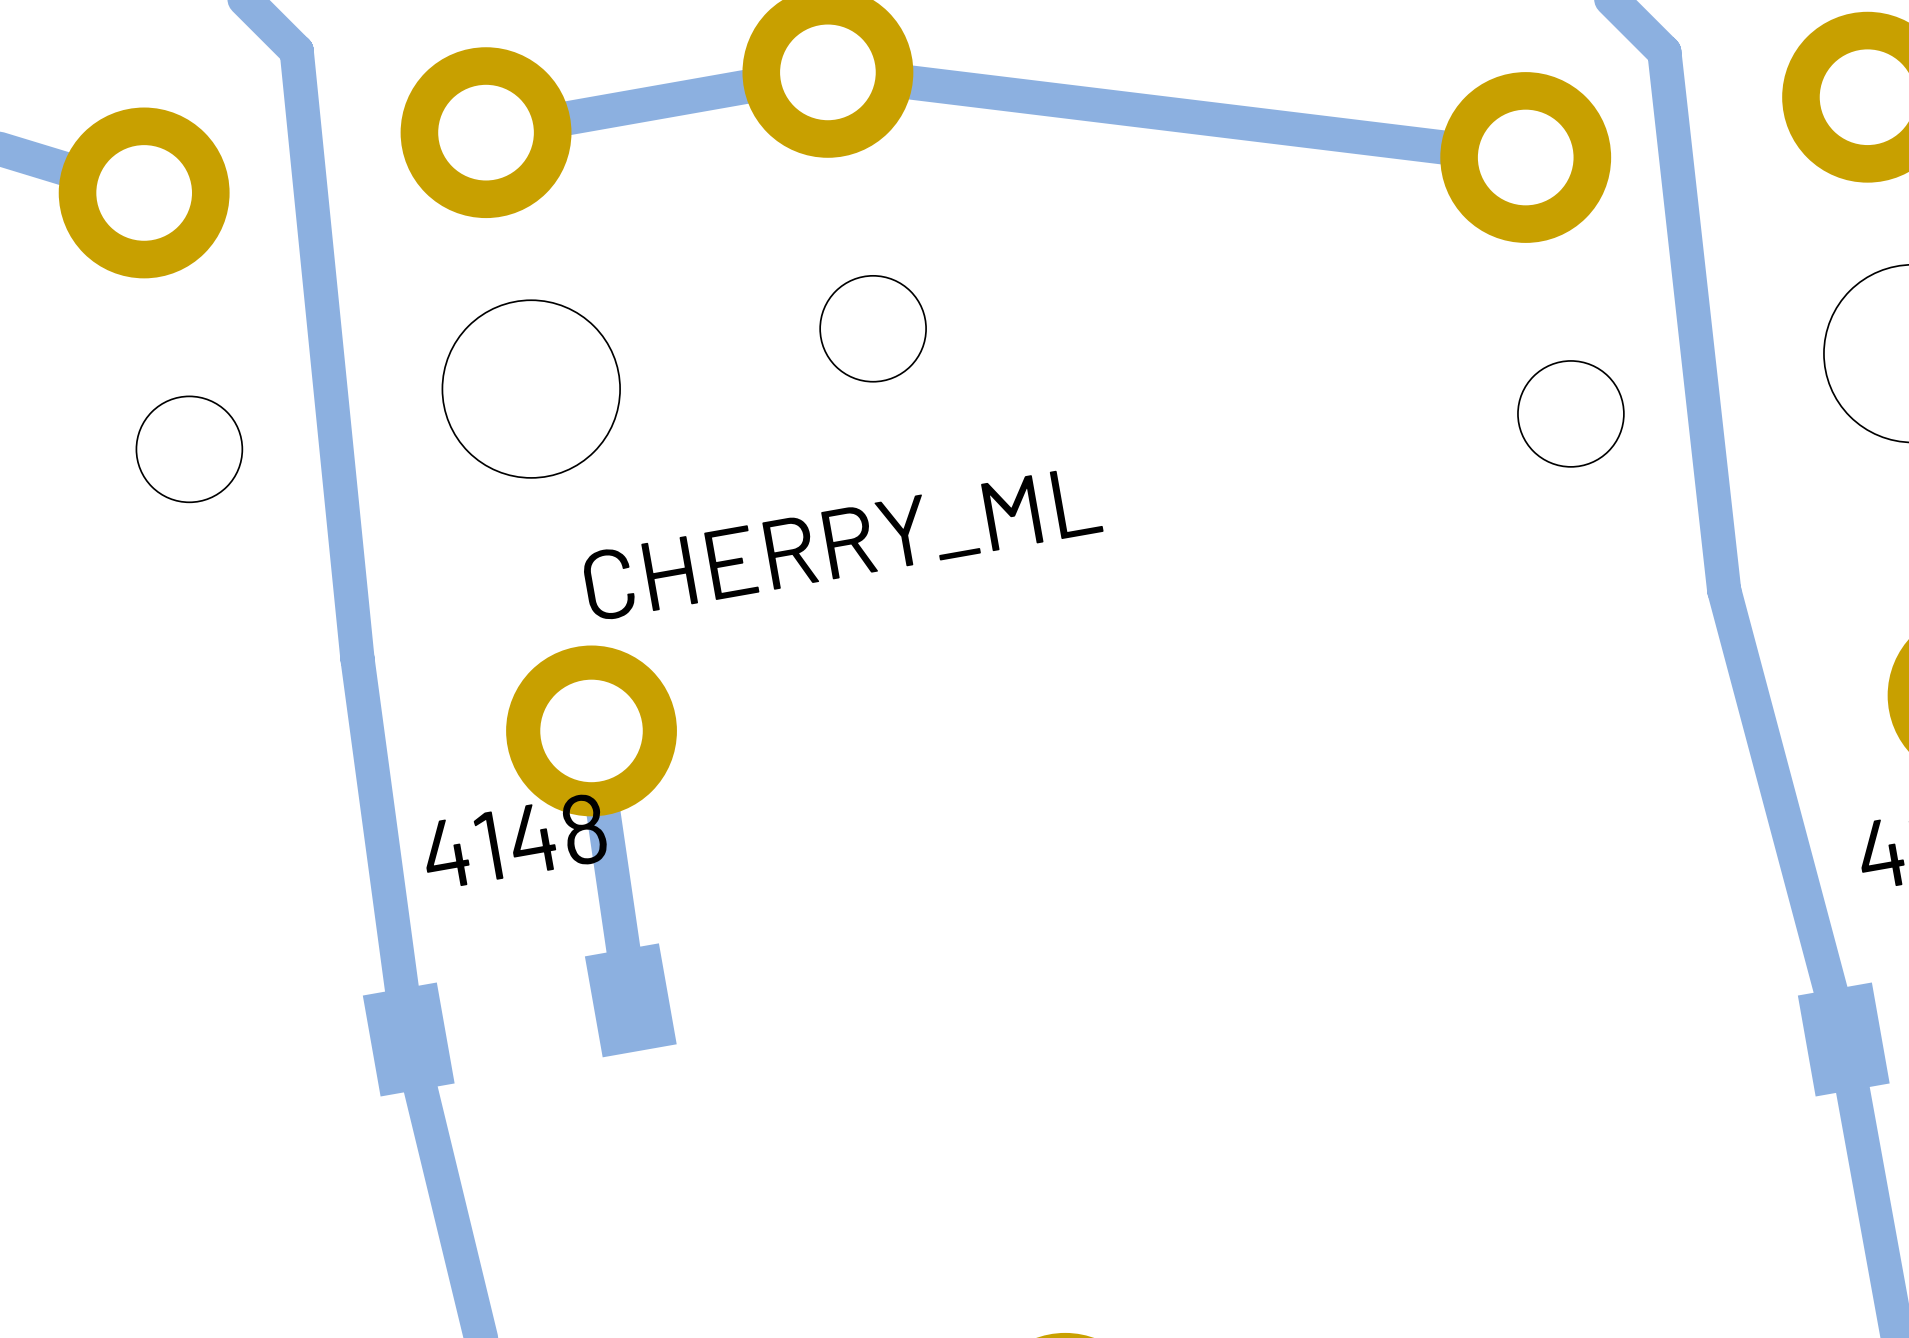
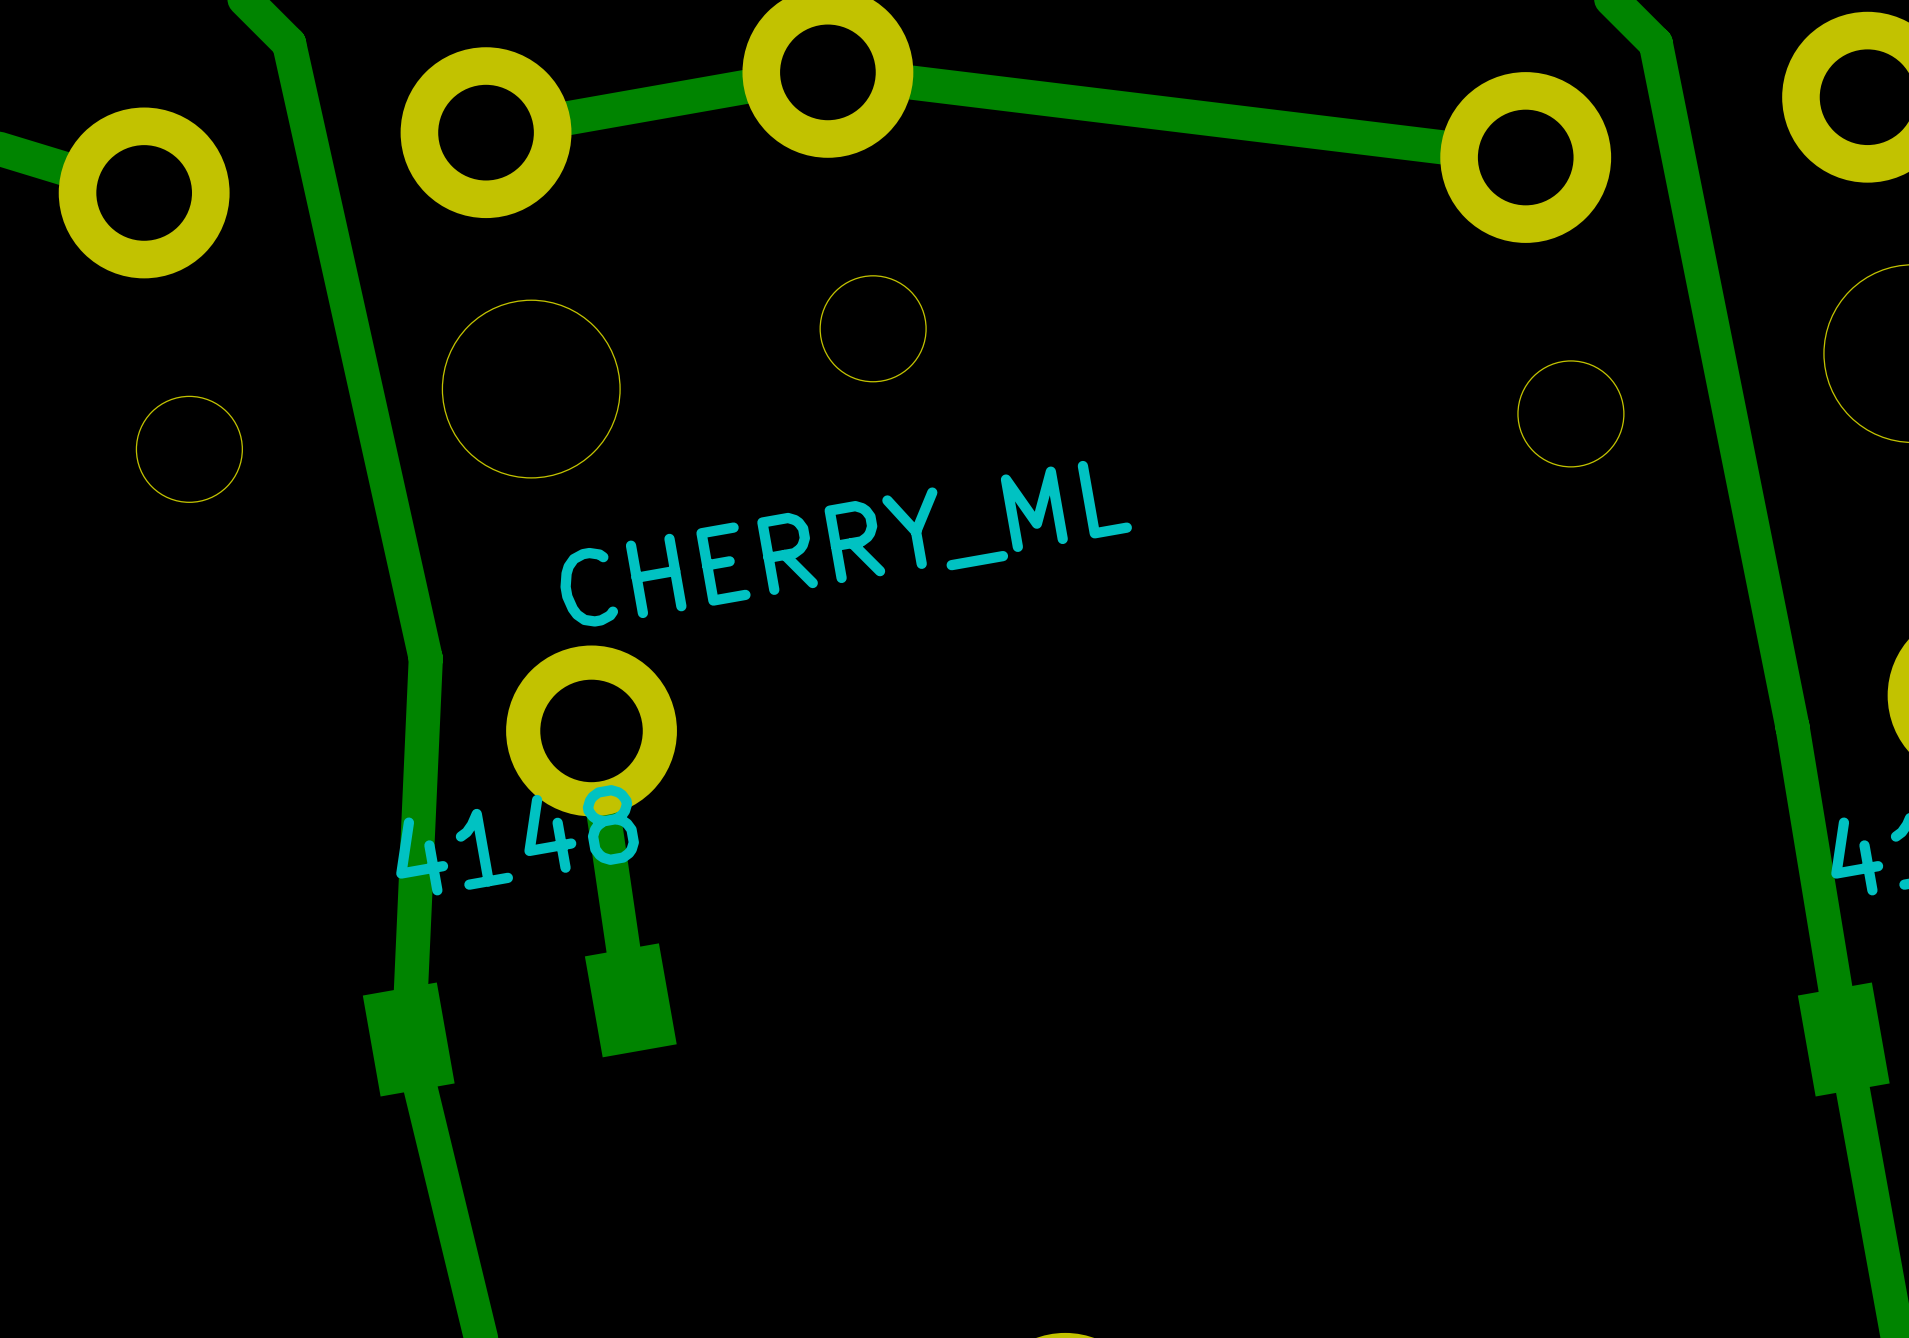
bottom track: (289, 43) (296, 51) (357, 658) (408, 1039) -> (289, 43) (425, 658) (408, 1039)
bottom track: (1655, 43) (1664, 52) (1724, 590) (1843, 1039) -> (1655, 43) (1792, 726) (1843, 1039)

